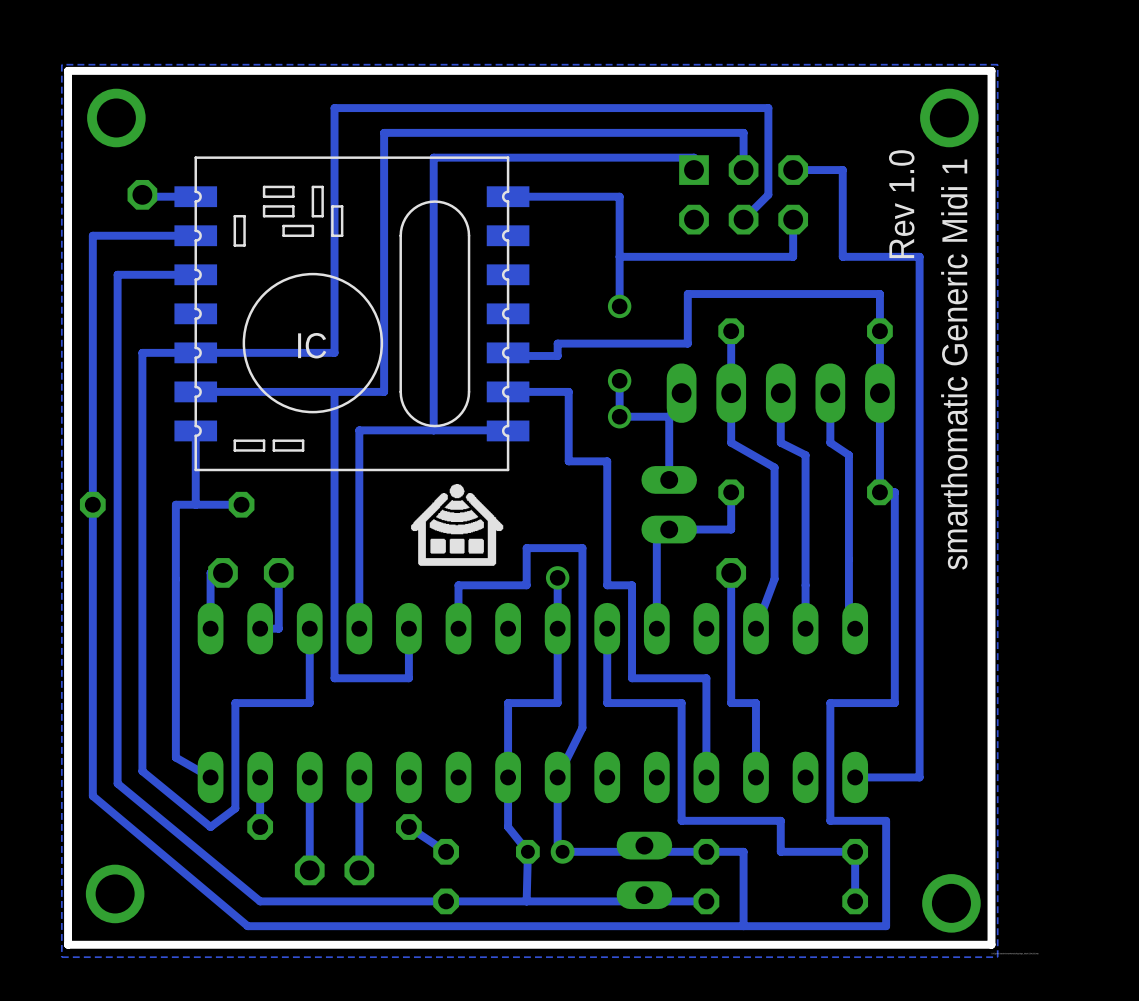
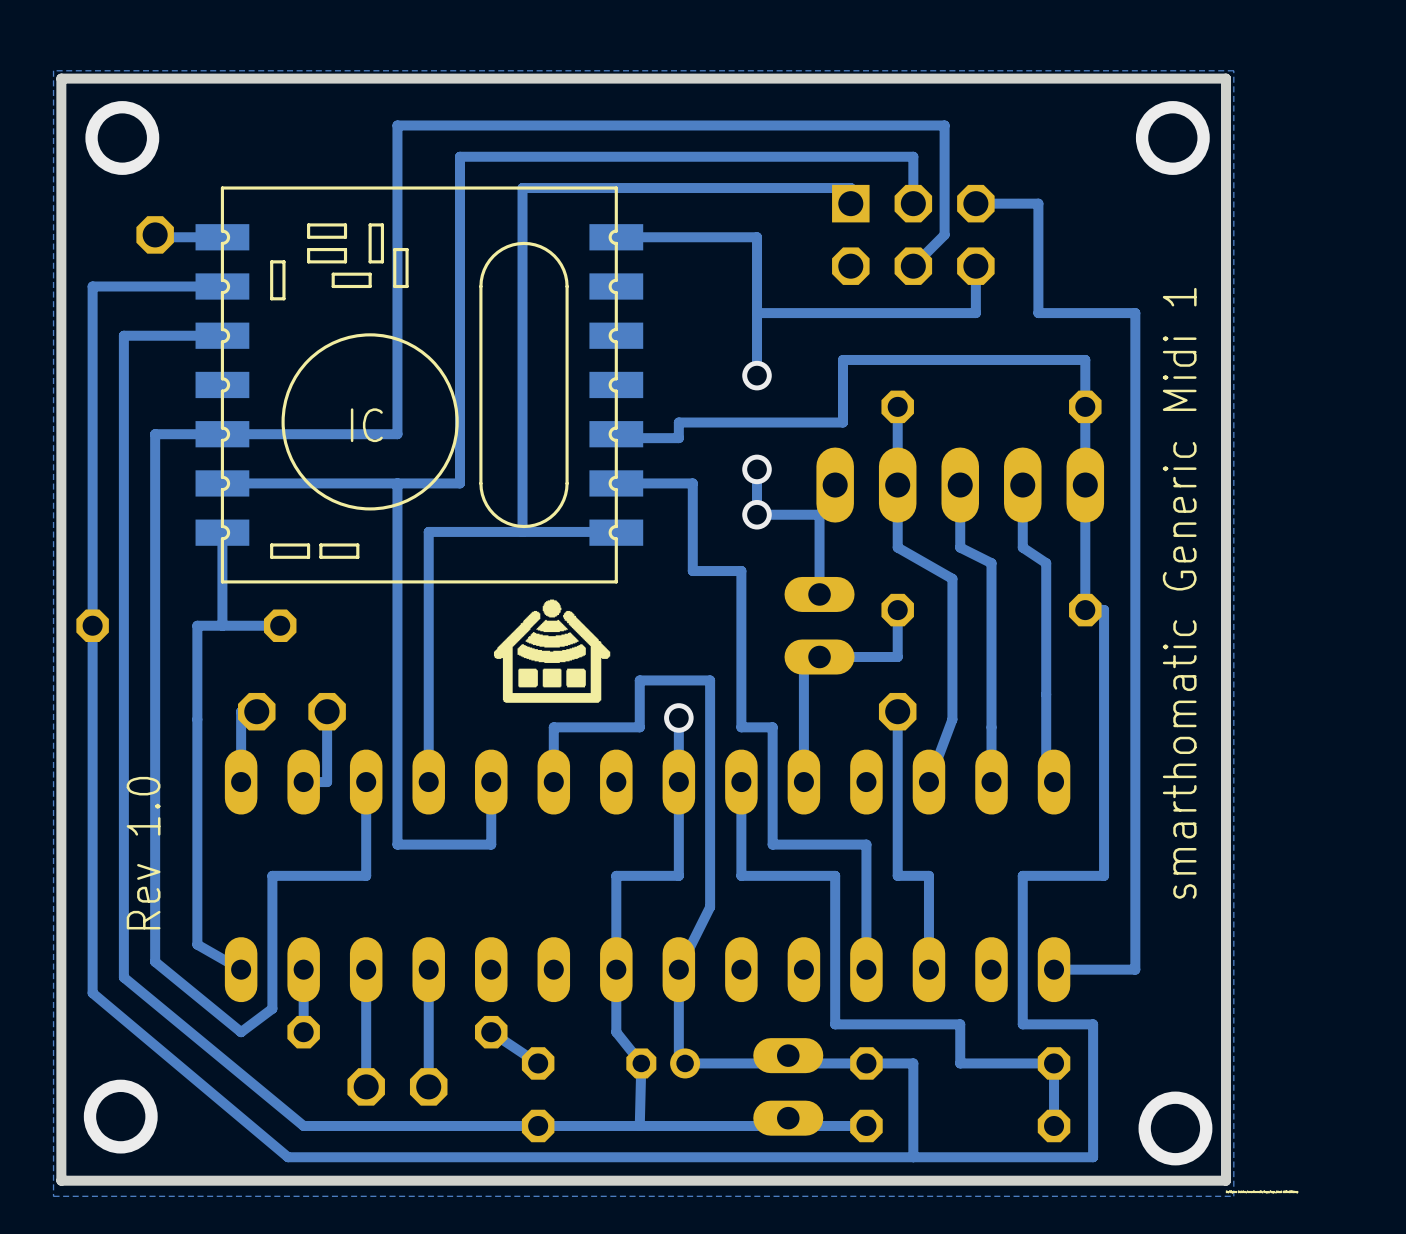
text: Rev 1.0 (901, 204) -> none
text position: smarthomatic Generic Midi 1 (954, 364) -> smarthomatic Generic Midi 1 (1179, 593)
text: none -> Rev 1.0 (143, 853)

